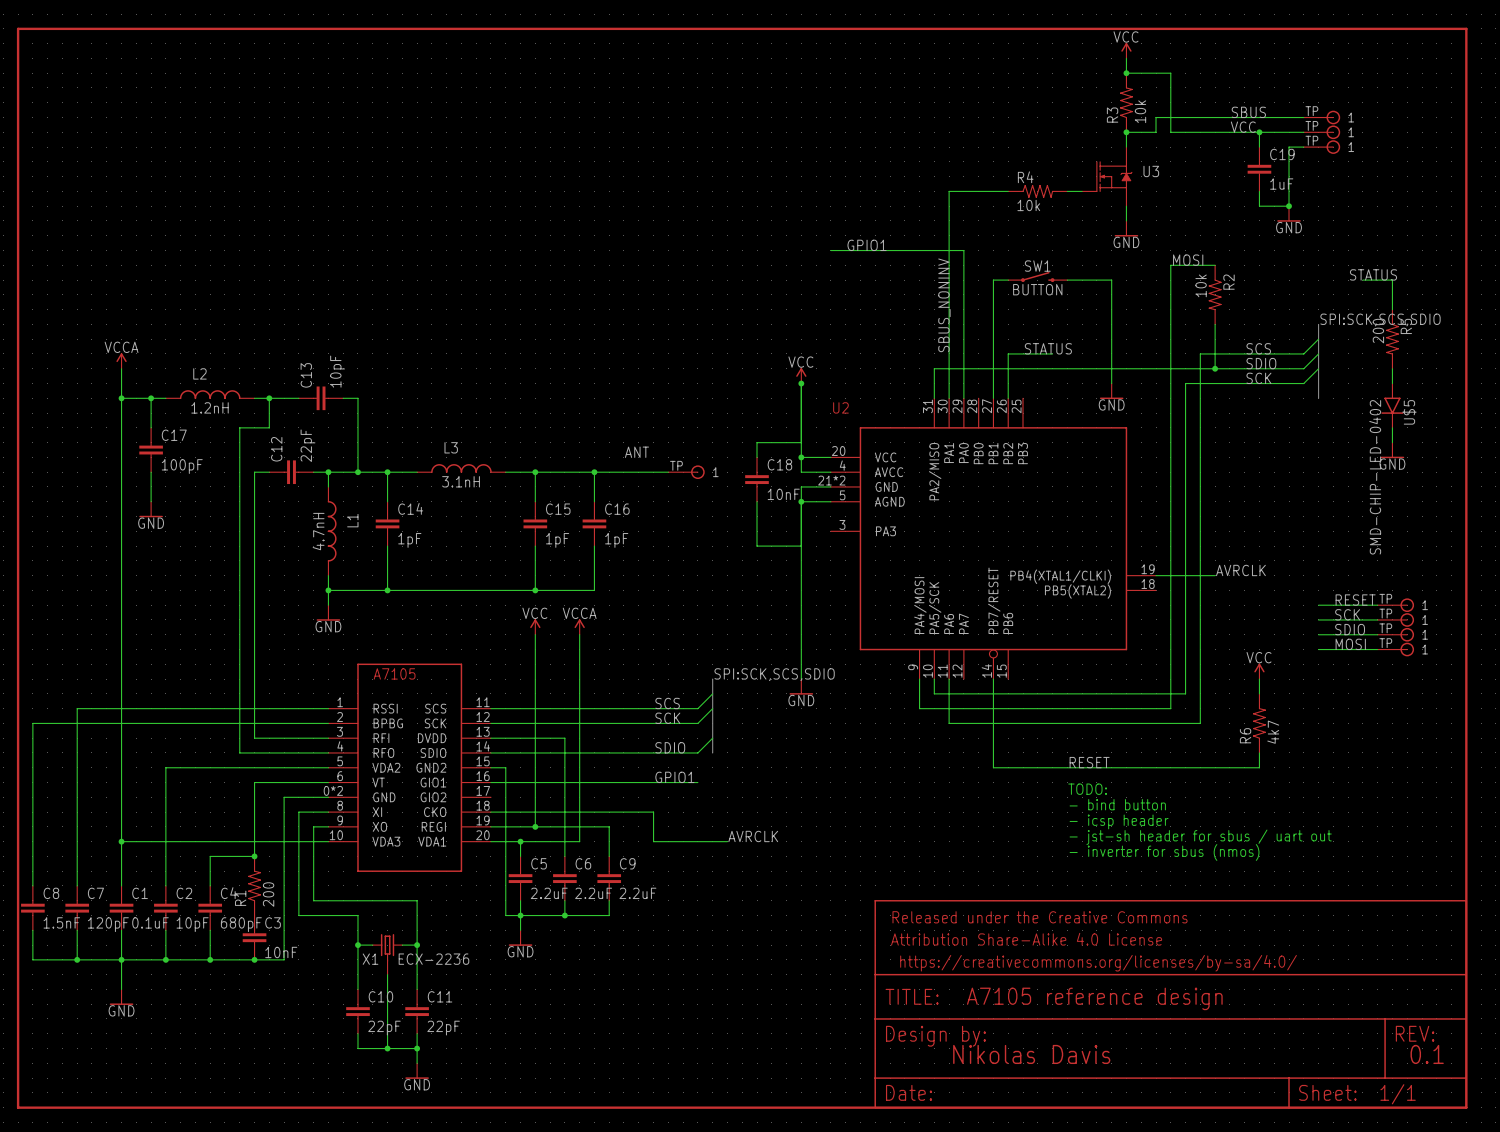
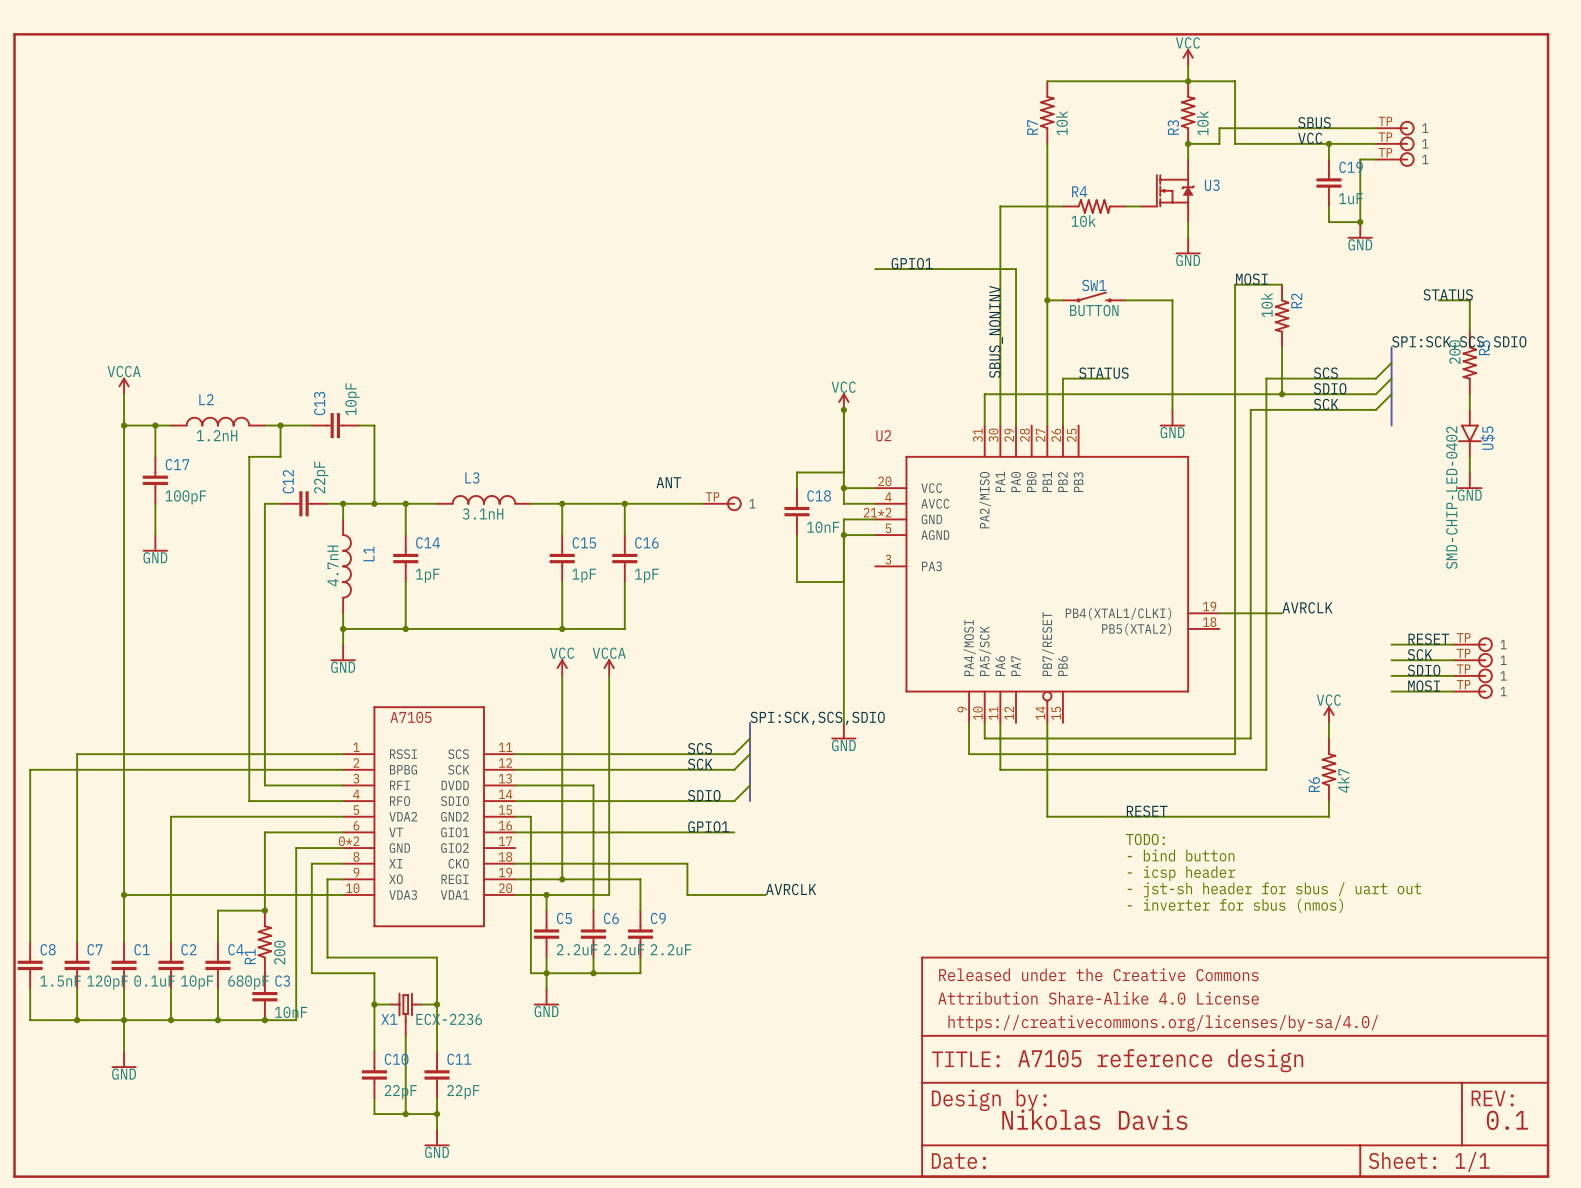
wire: none -> (1047, 81) (1188, 81)
R7: none -> 10k (1047, 112)
wire: none -> (1047, 143) (1047, 300)
junction: none -> (1047, 300)

